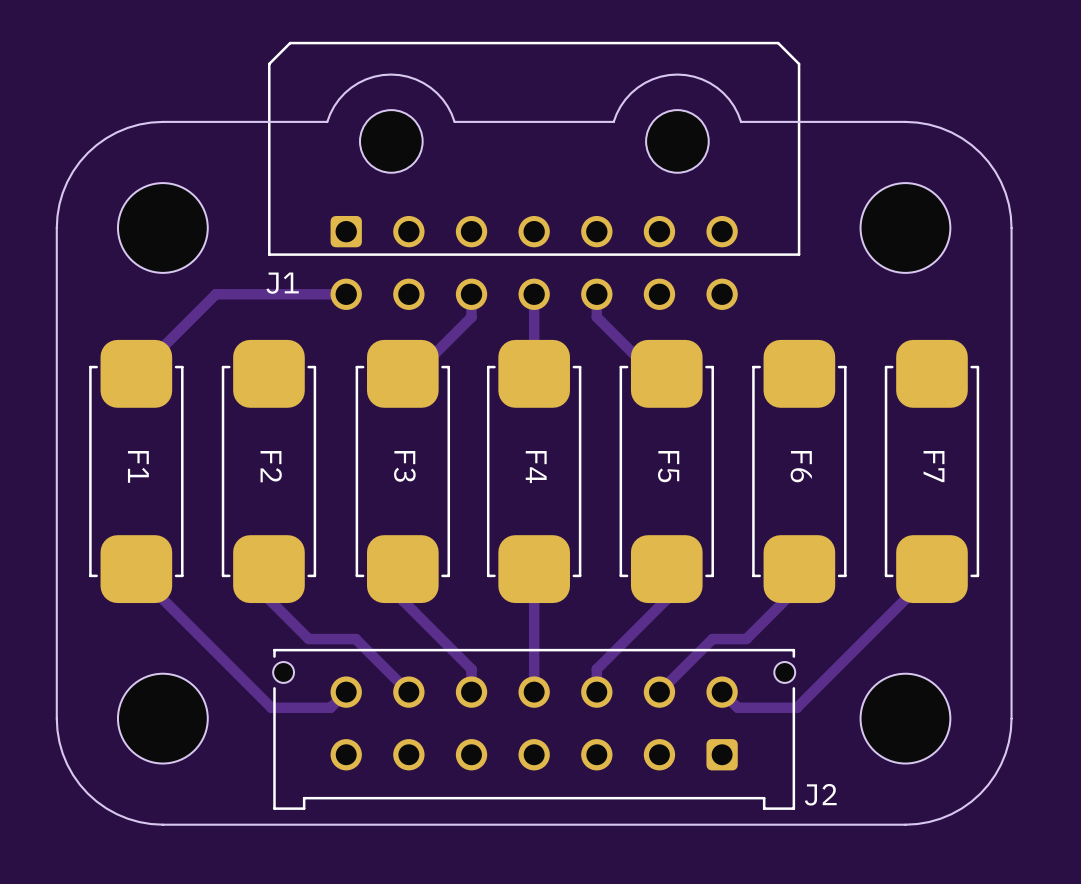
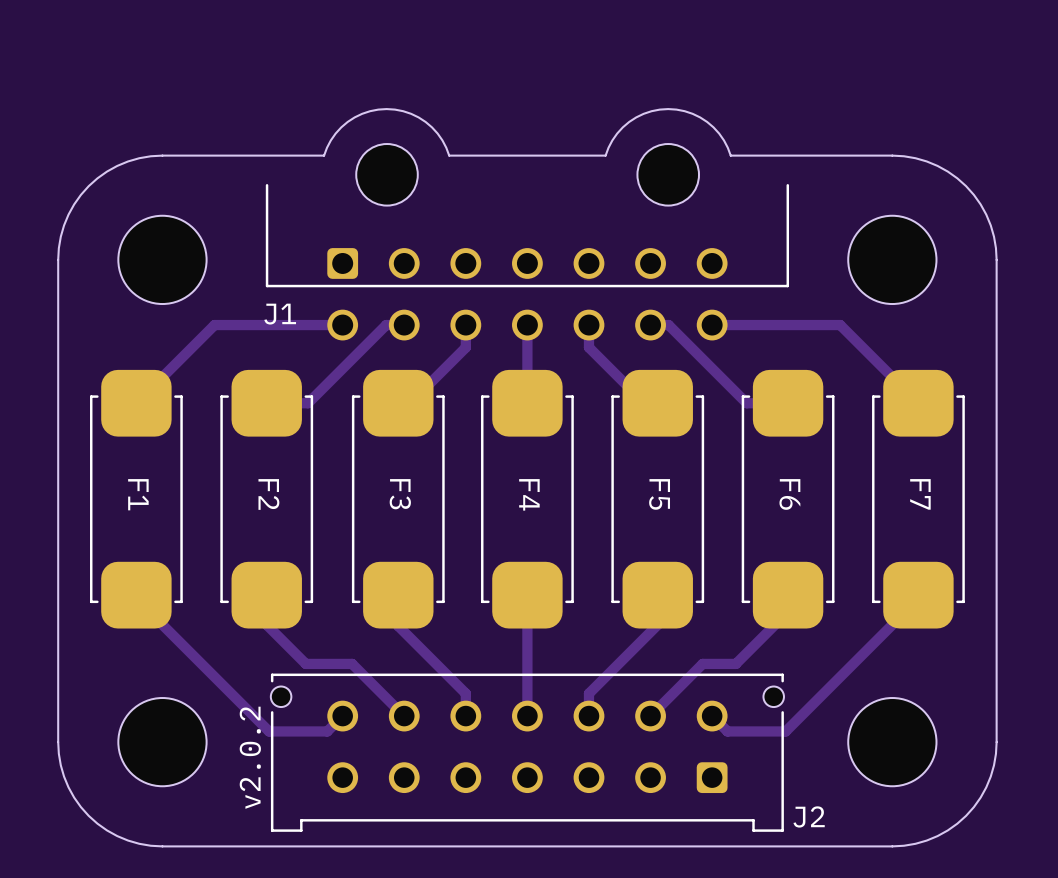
J1 footprint: [268, 41, 801, 310] -> [265, 144, 790, 341]
track: none -> (404, 325) (386, 325) (308, 403) (266, 403)
track: none -> (650, 325) (668, 325) (746, 403) (788, 403)
track: none -> (712, 325) (840, 325) (918, 403)
text: none -> v2.0.2 (250, 757)

